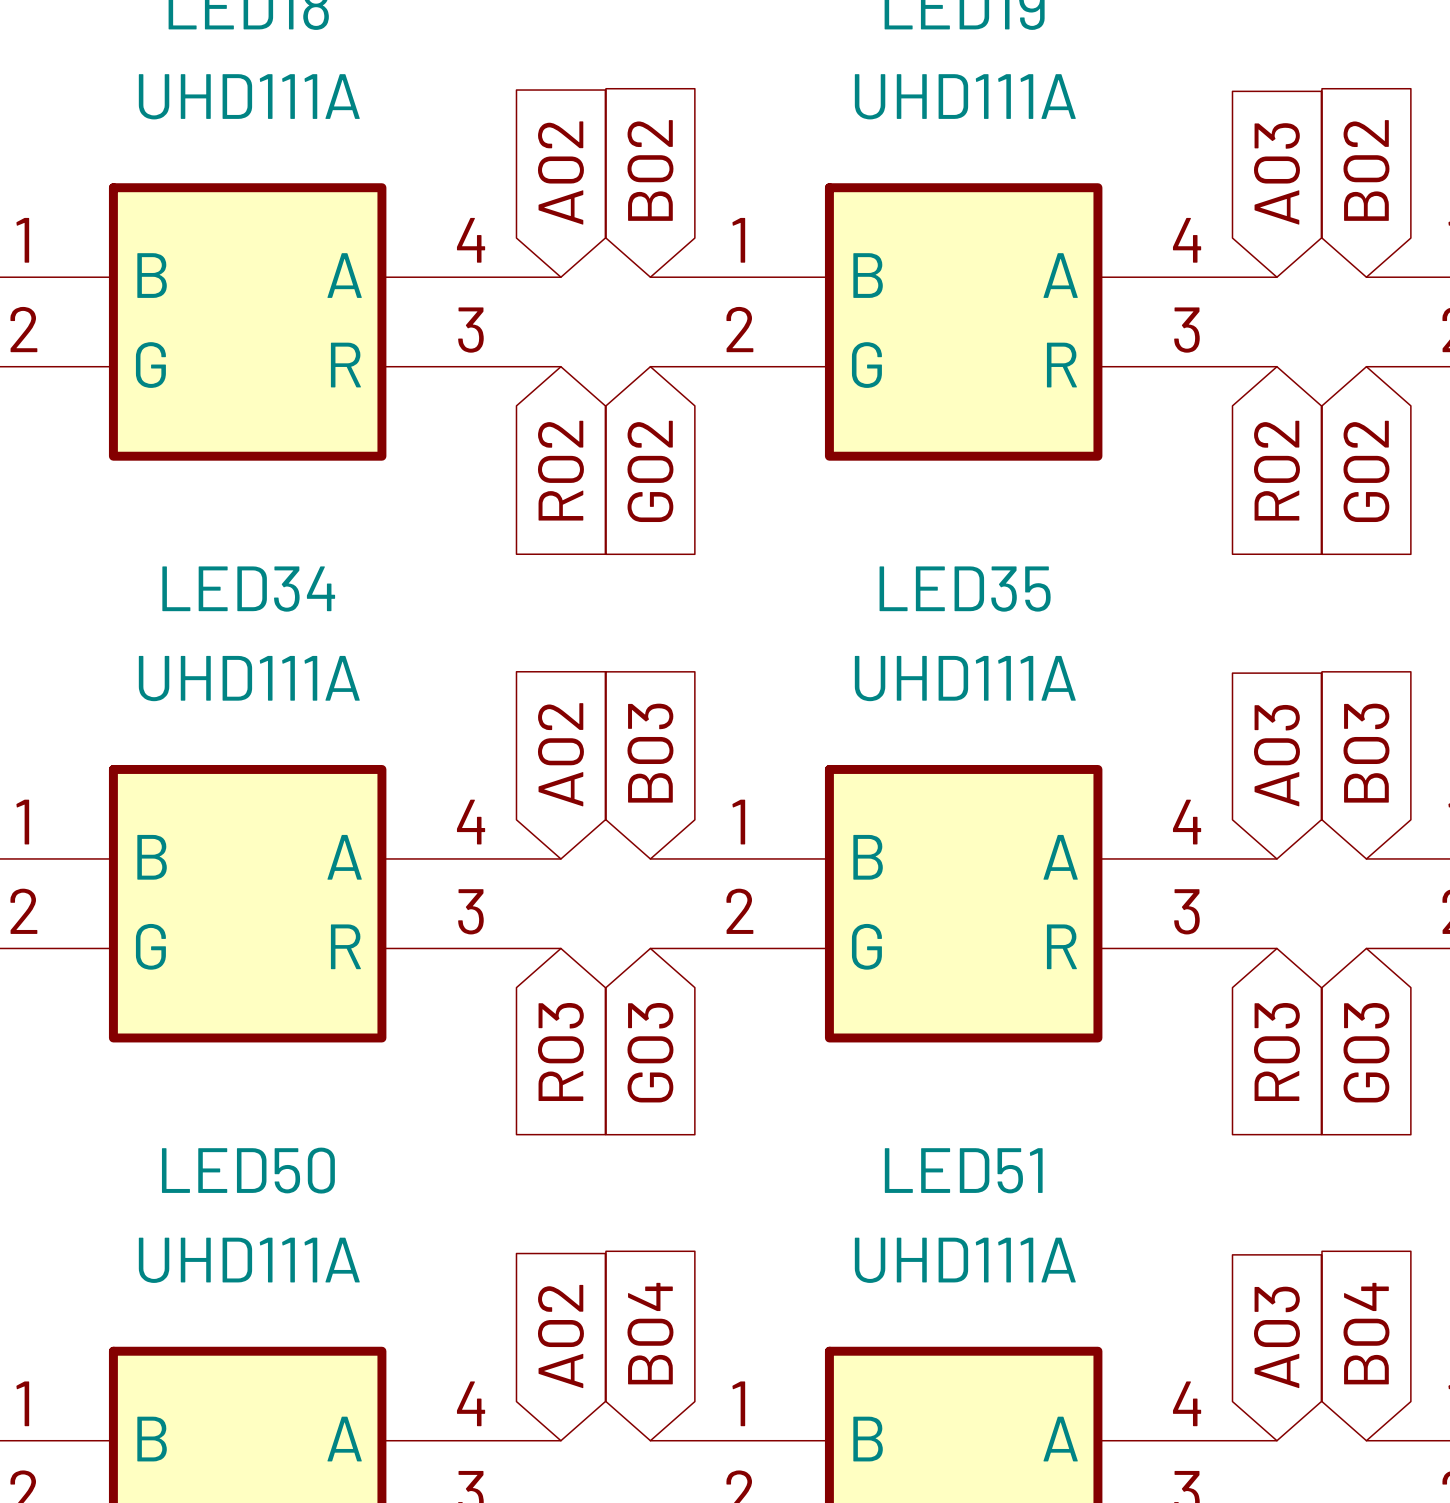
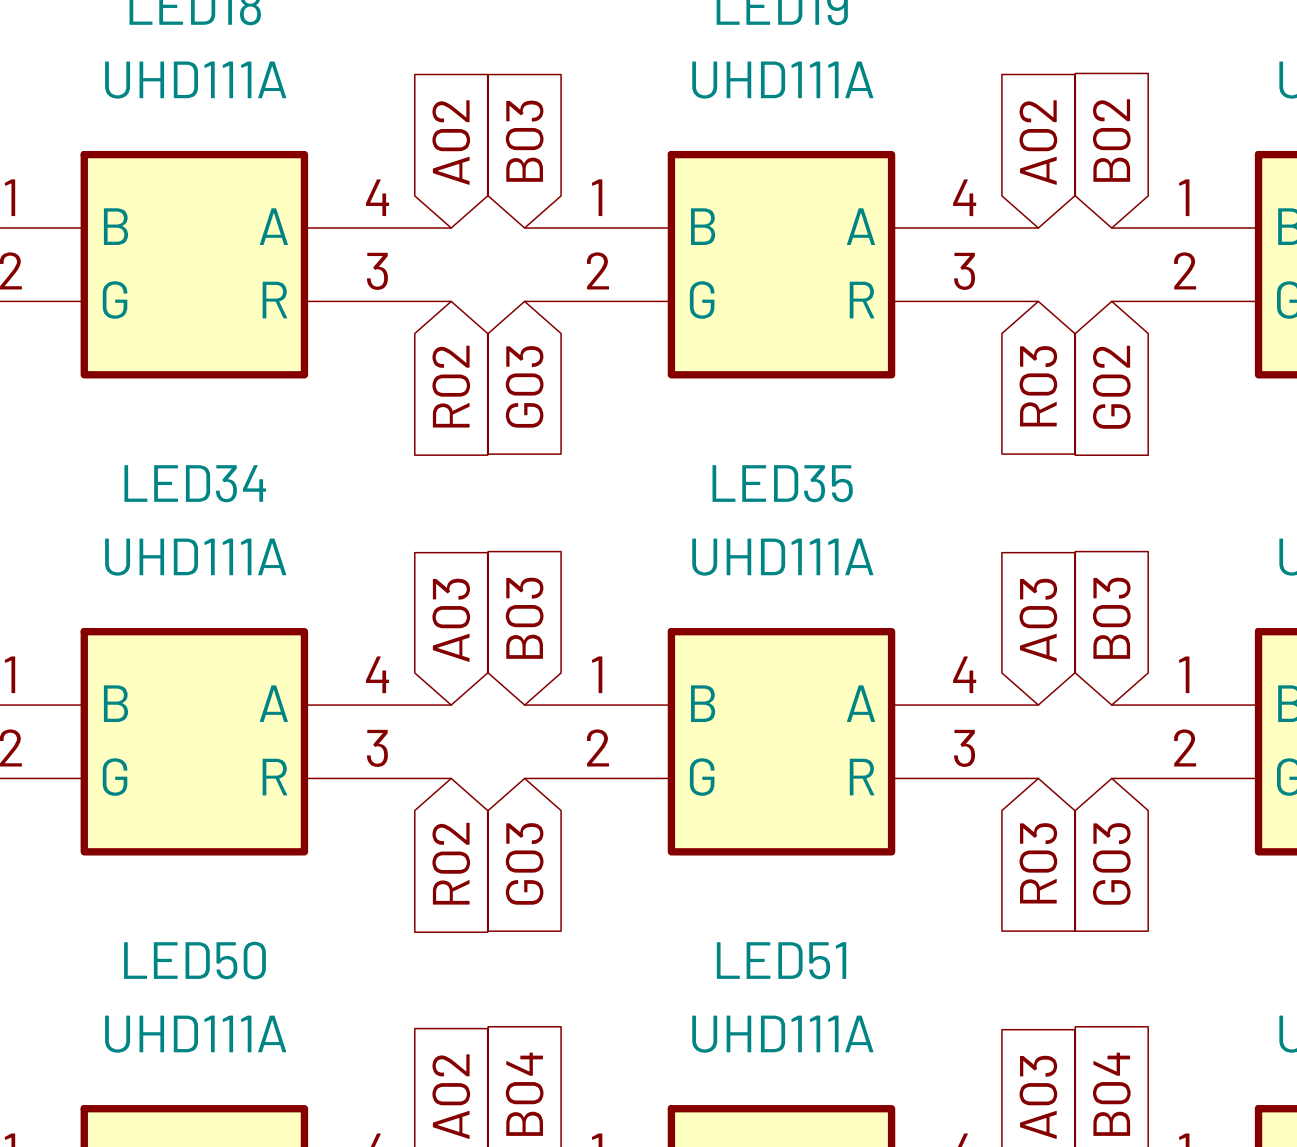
global label: B02 (650, 170) -> B03 (524, 141)
global label: A03 (1276, 173) -> A02 (1038, 142)
global label: R02 (1276, 470) -> R03 (1038, 386)
global label: G02 (650, 471) -> G03 (524, 386)
global label: A02 (560, 754) -> A03 (451, 620)
global label: R03 (560, 1051) -> R02 (451, 863)

